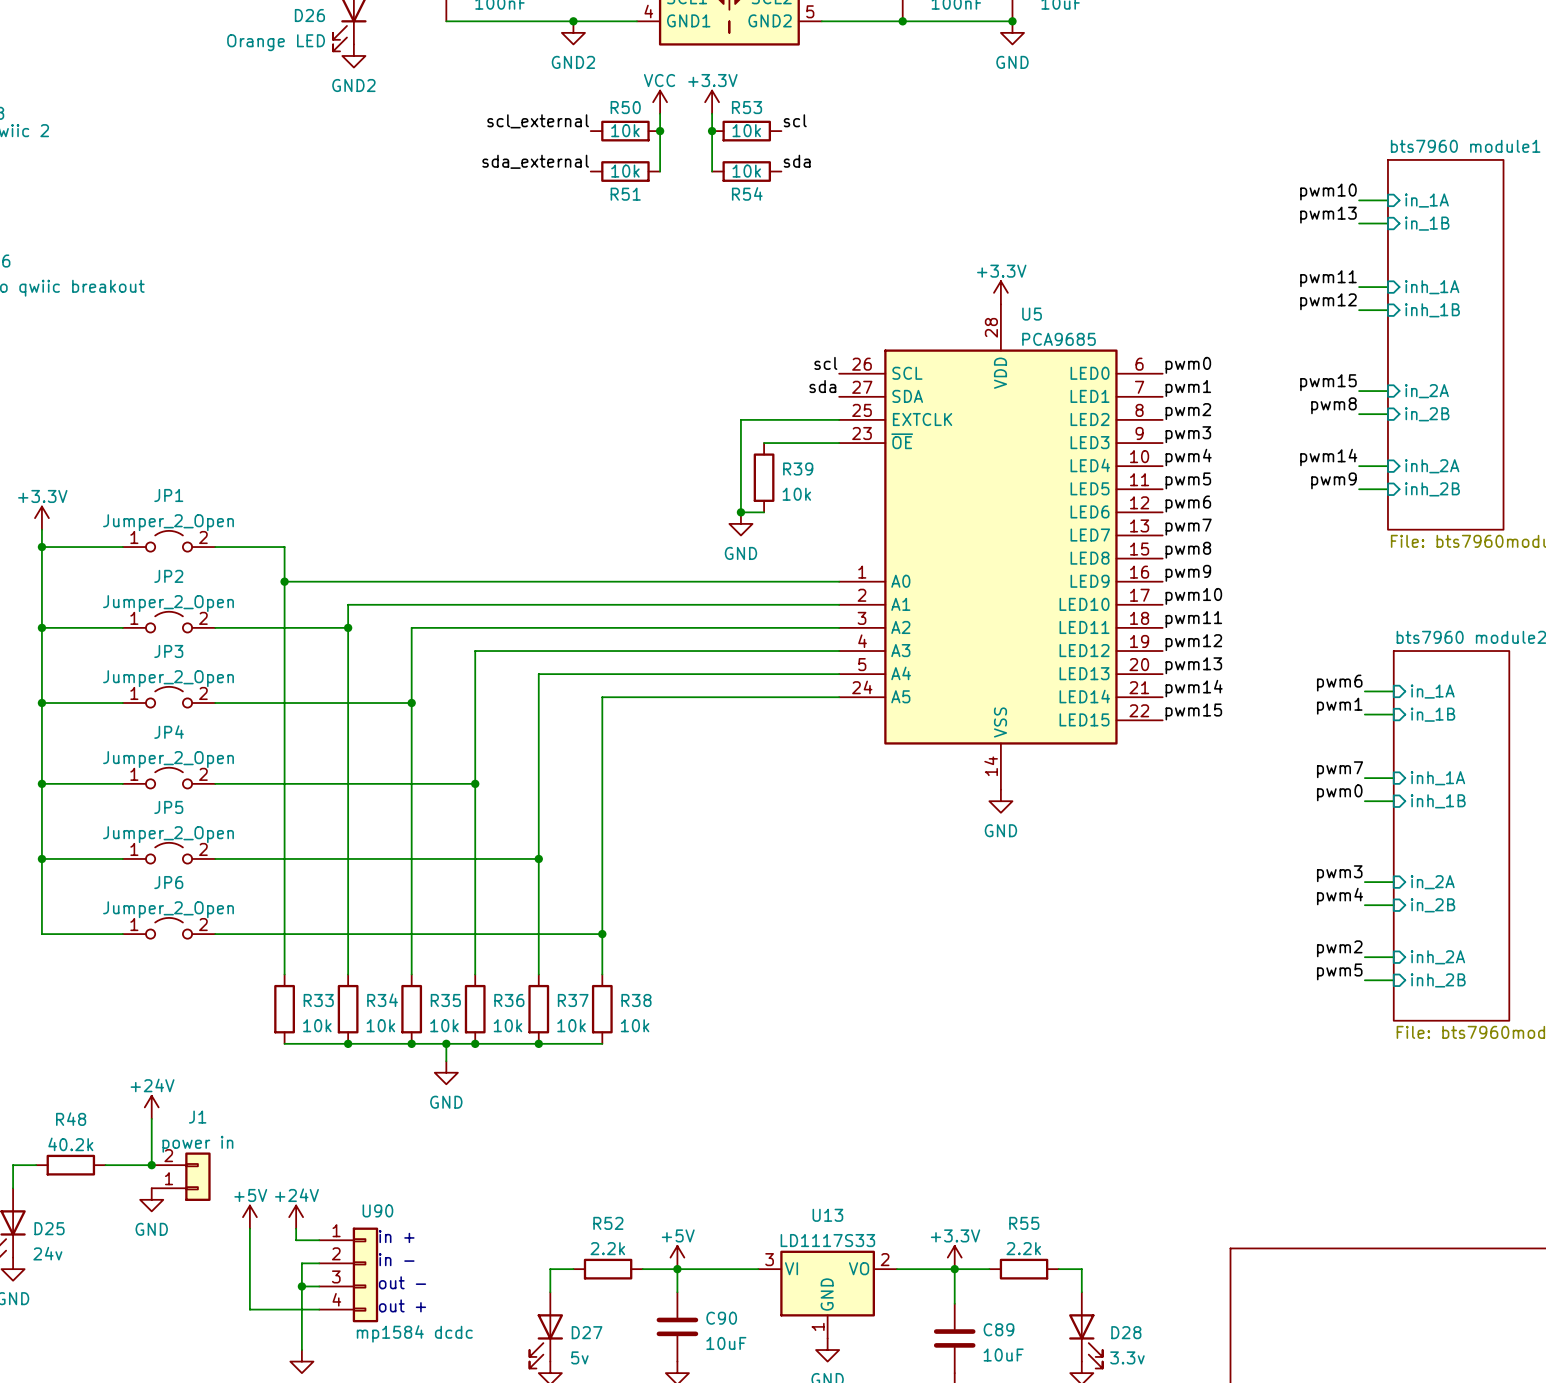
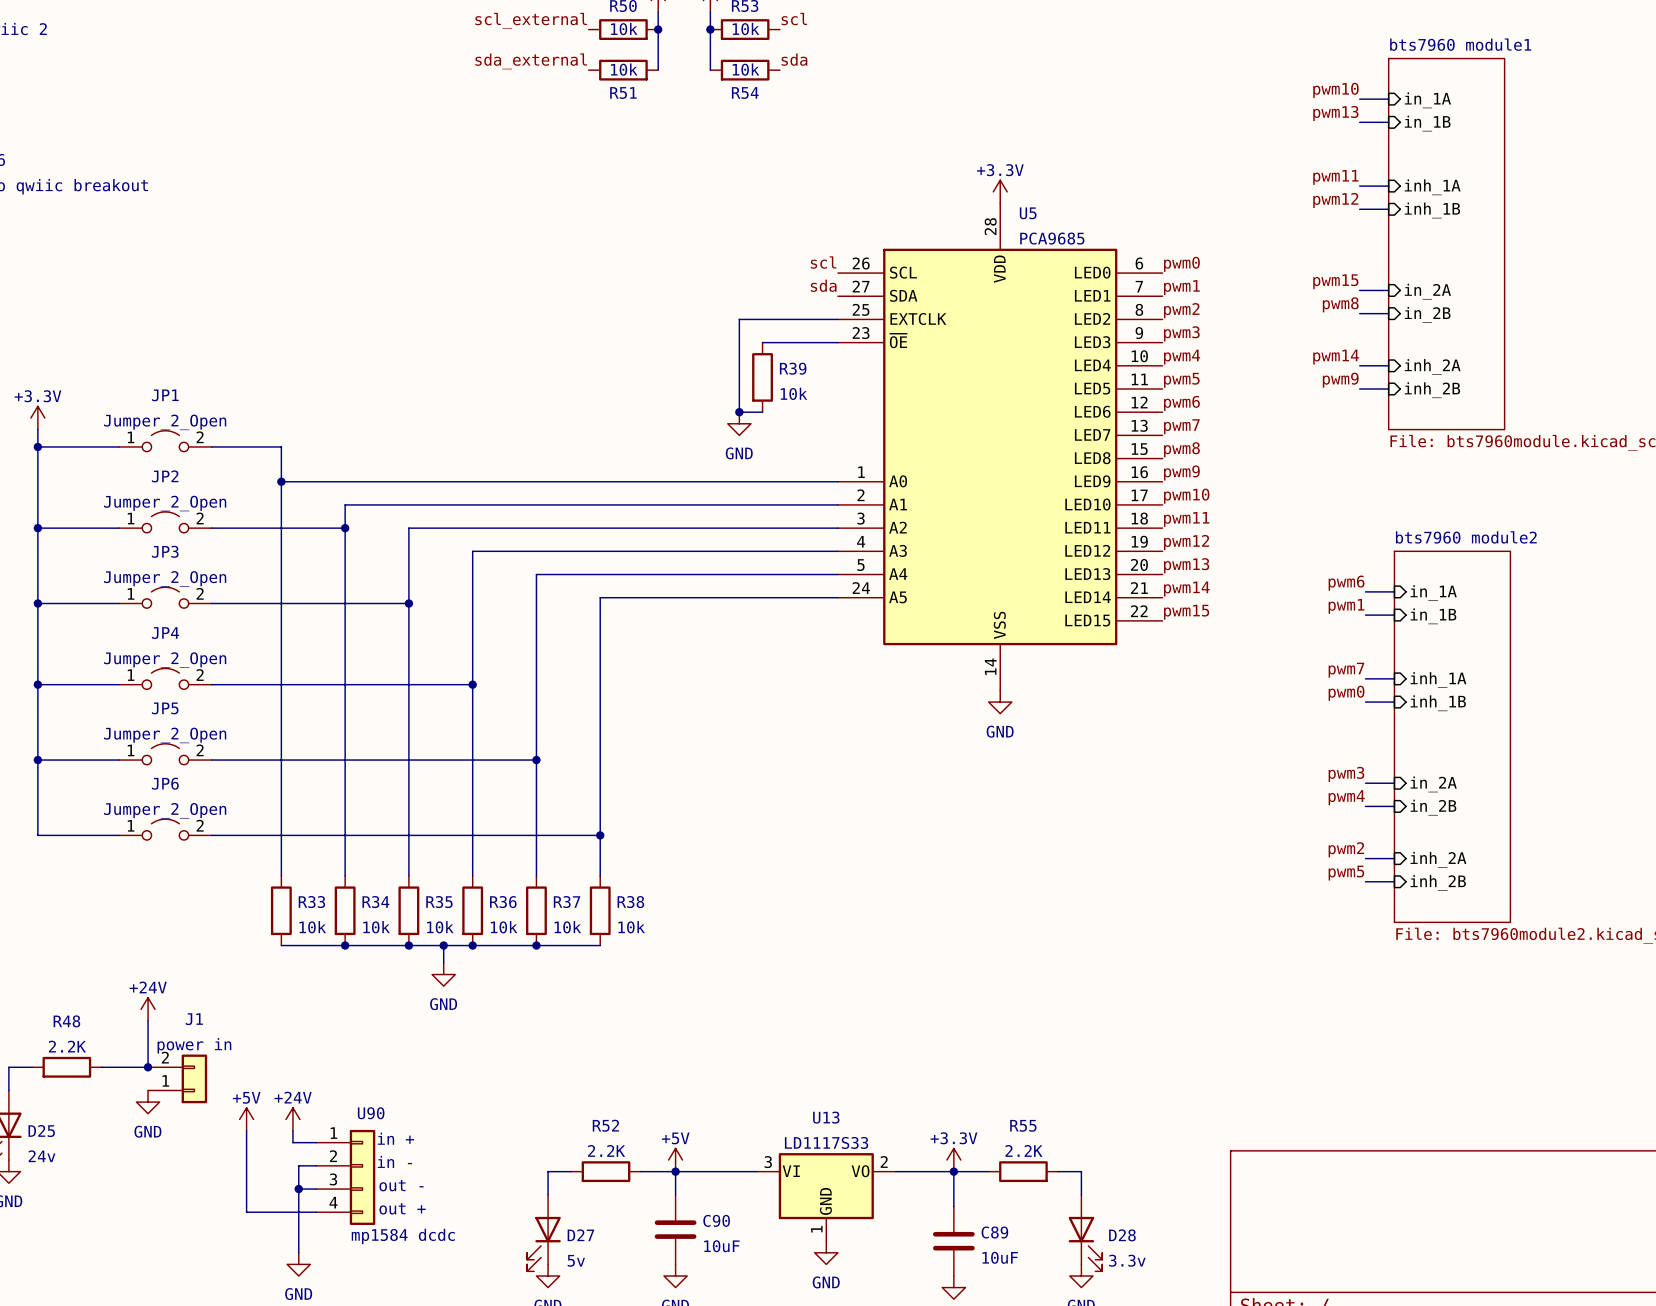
R48 value: 40.2k (70, 1144) -> 2.2K (67, 1046)
R52 value: 2.2k (607, 1248) -> 2.2K (606, 1150)
R55 value: 2.2k (1023, 1248) -> 2.2K (1023, 1150)

